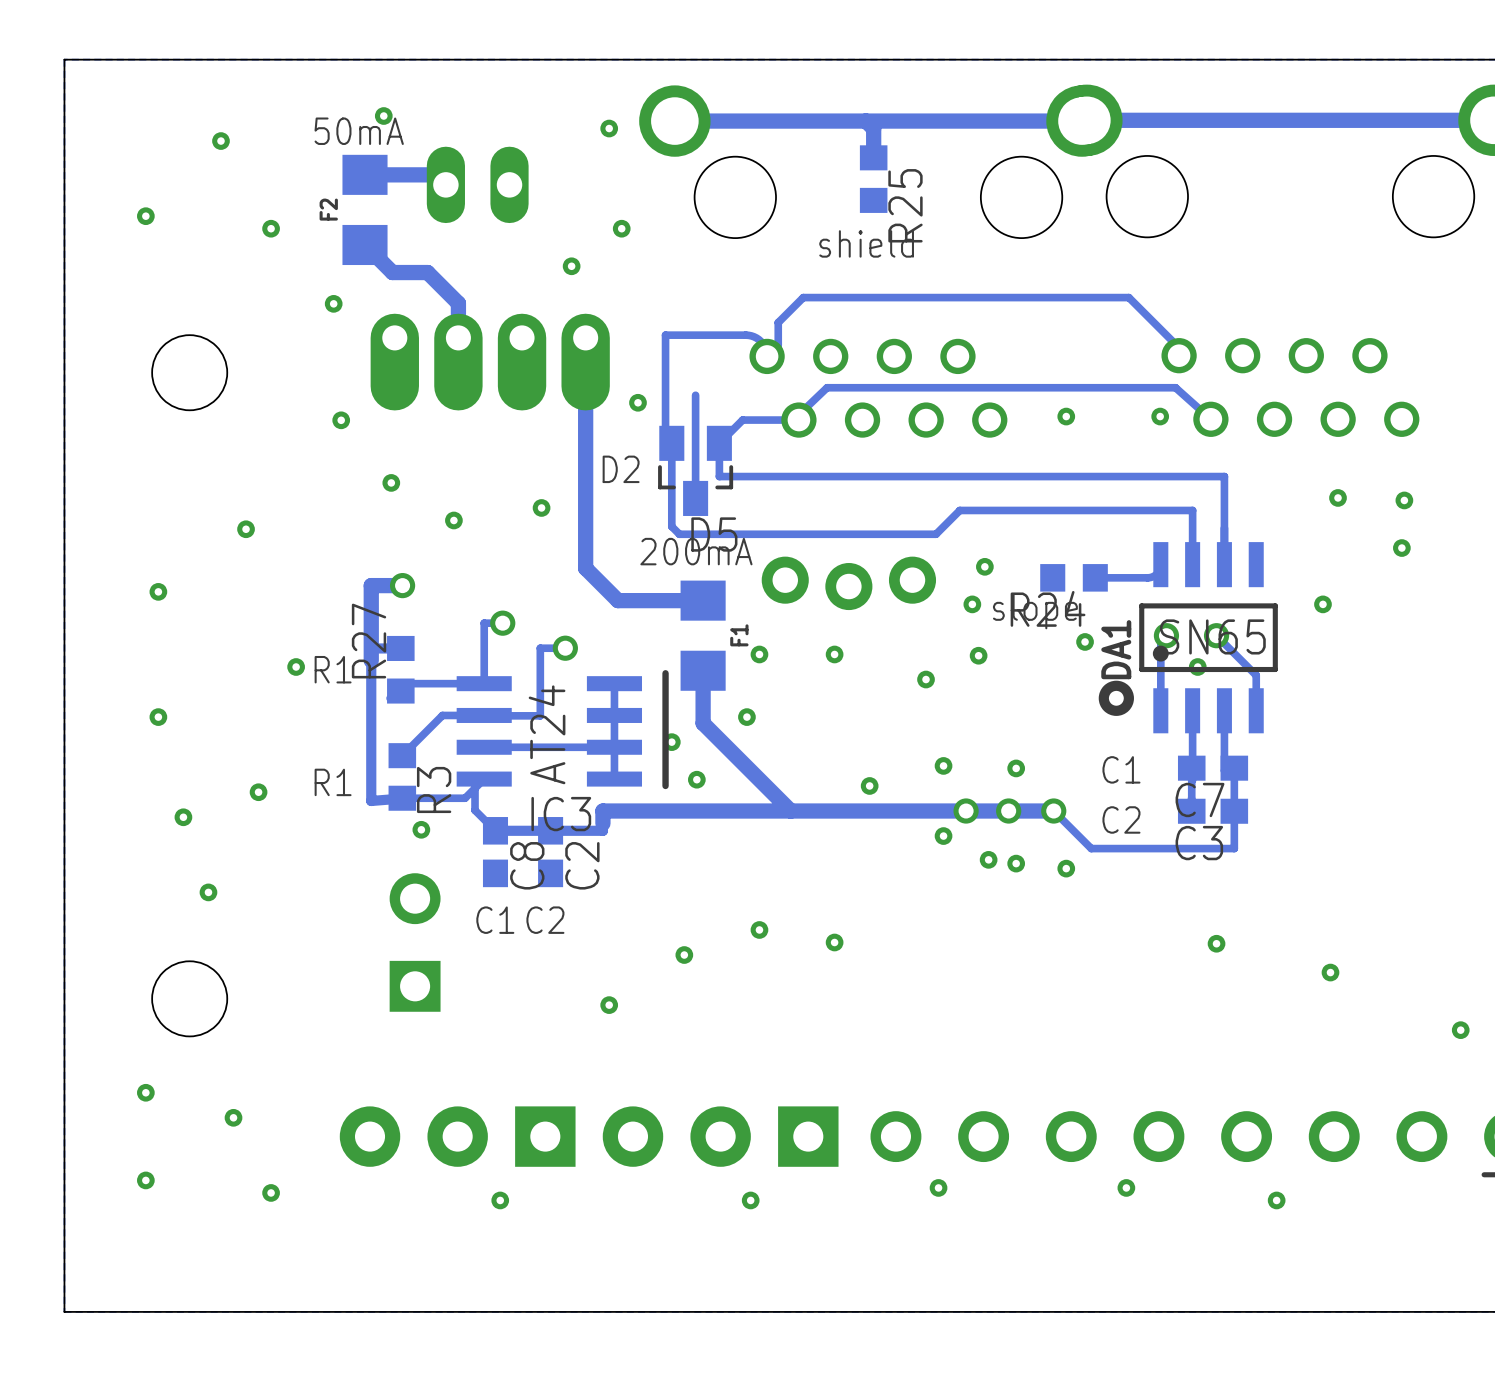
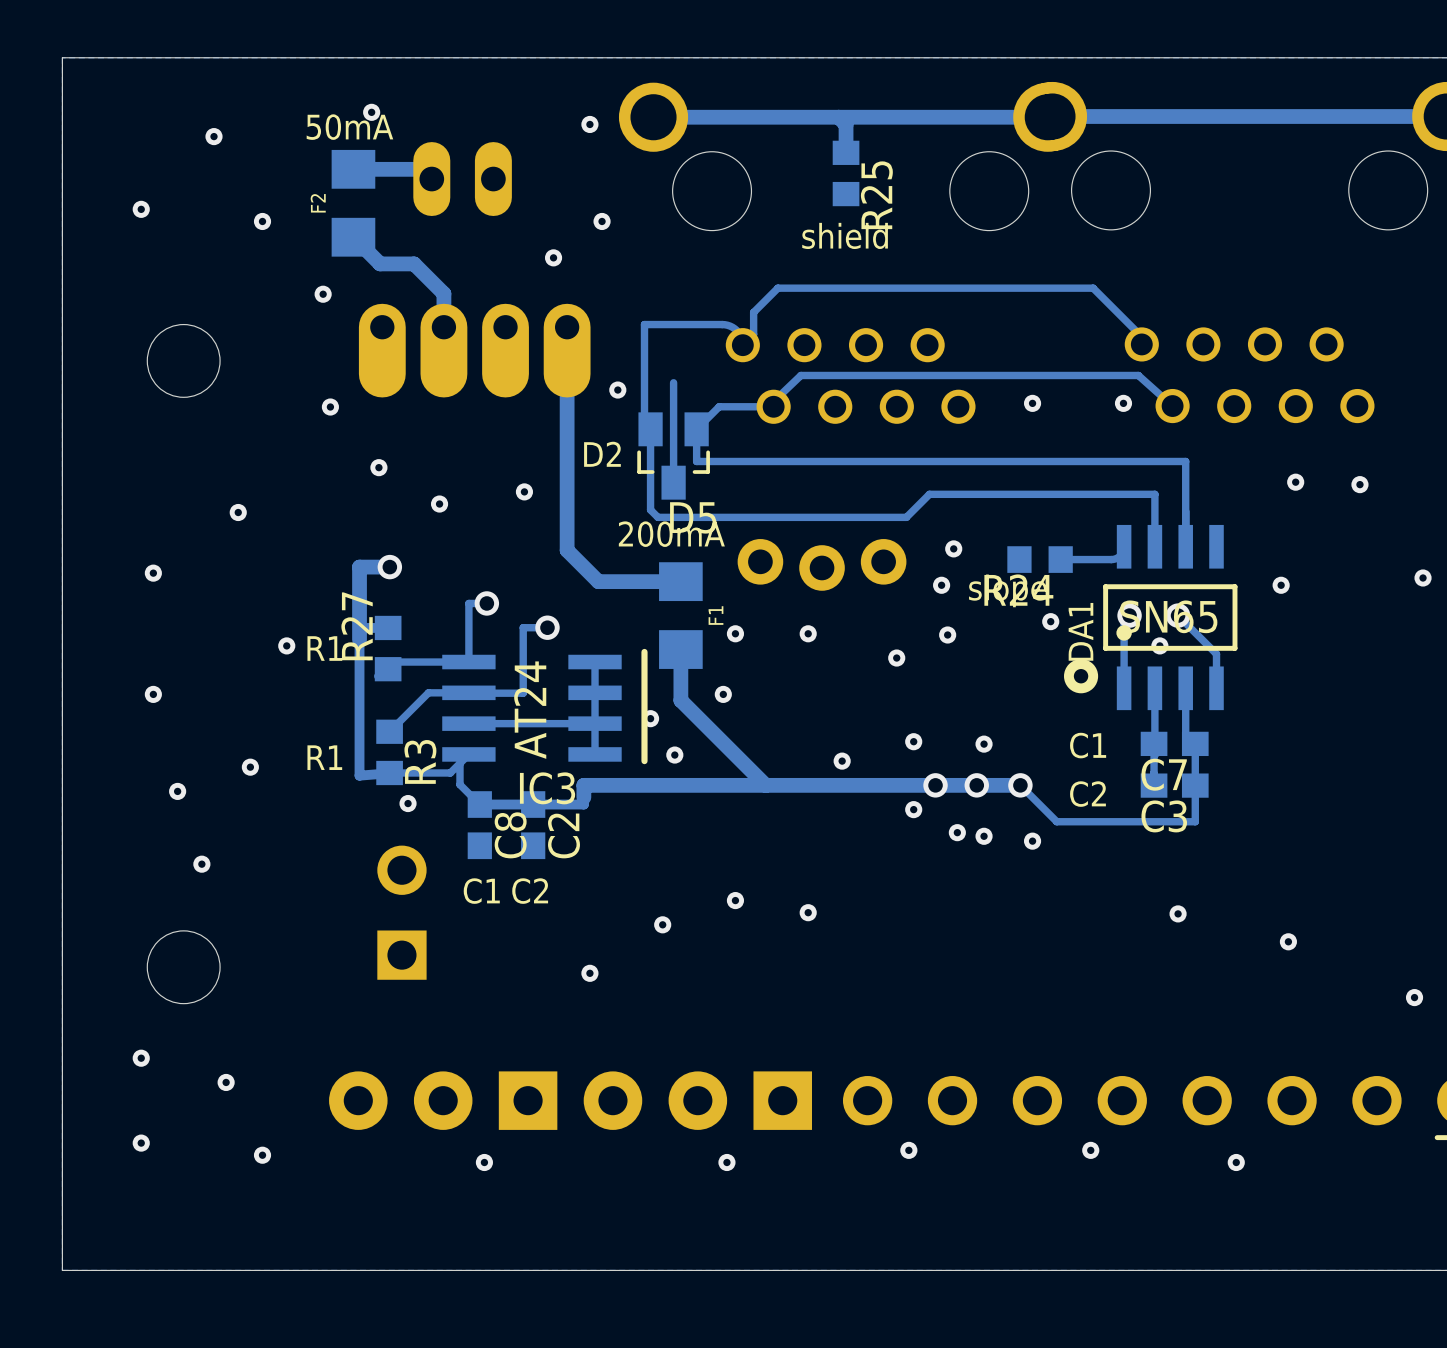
via: (1401, 548) -> none
via: none -> (1423, 578)

